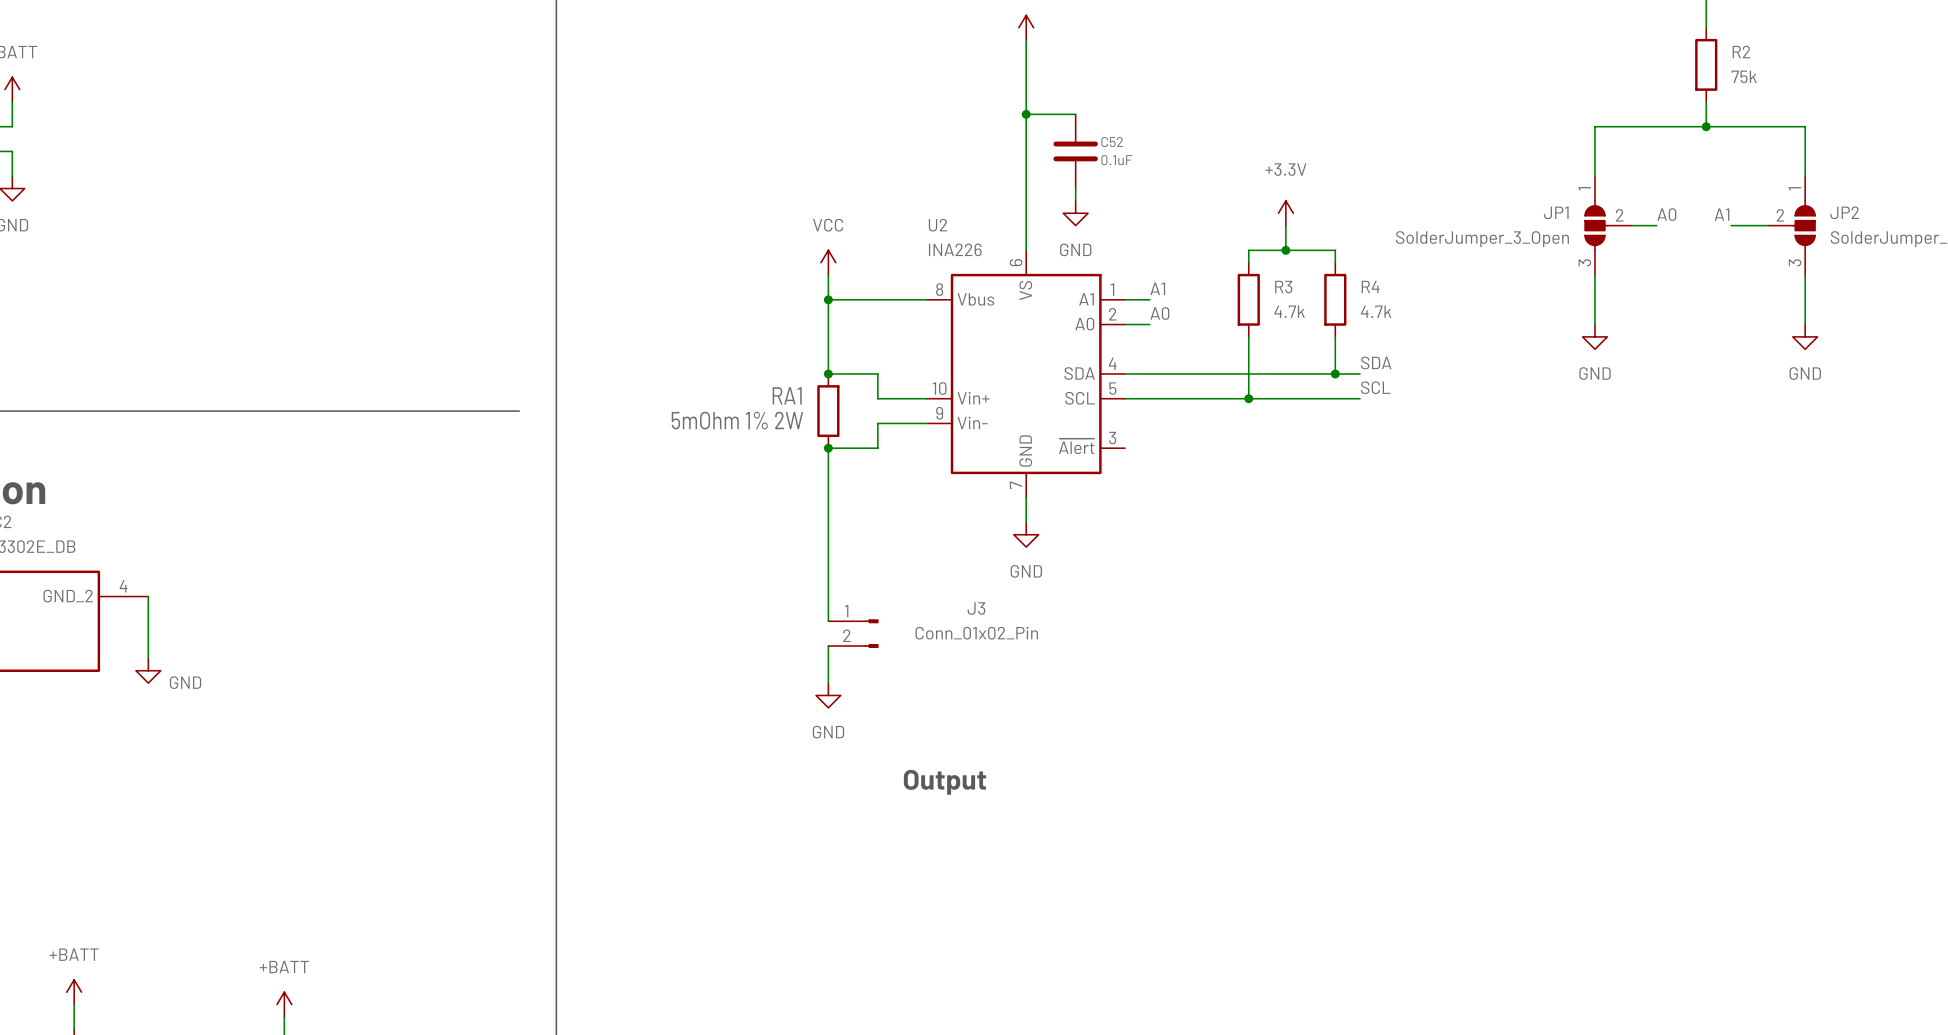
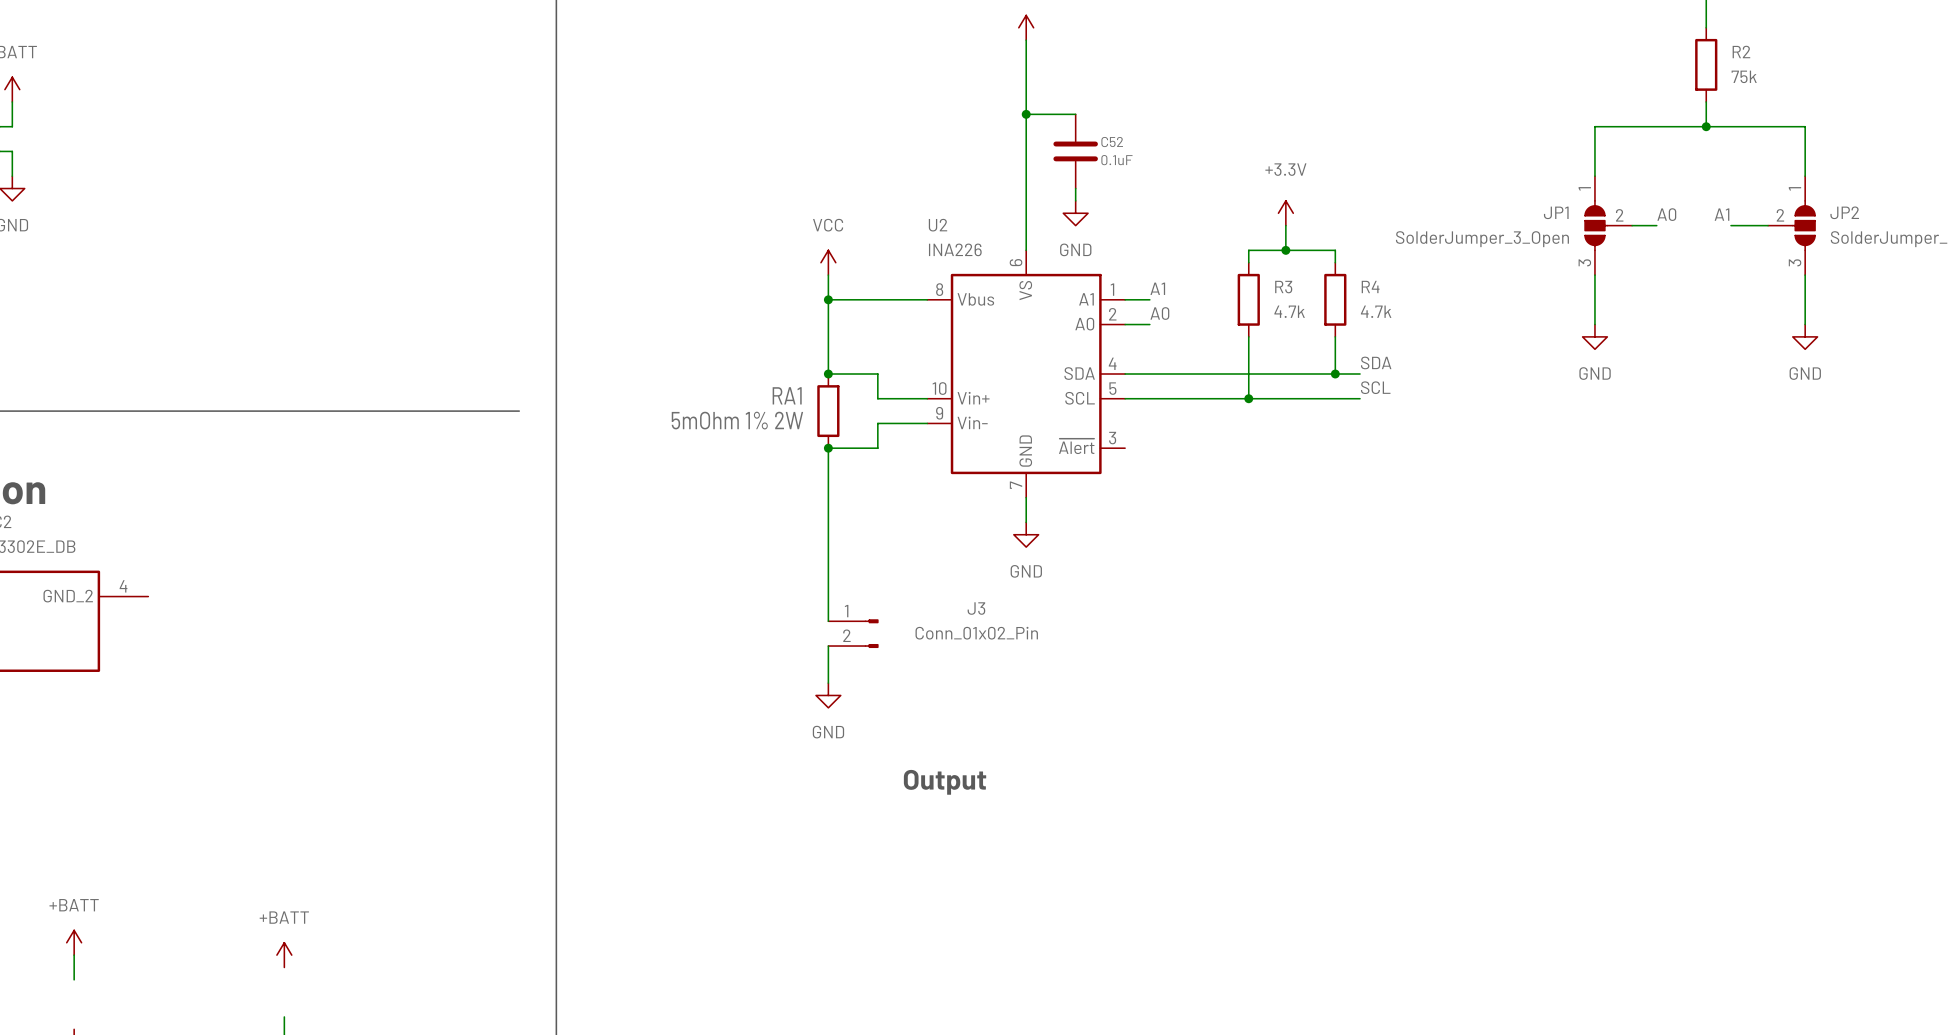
wire: (148, 596) (148, 658) -> none
power symbol: GND (148, 670) -> none
power symbol position: +BATT (74, 992) -> +BATT (74, 942)
wire: (74, 1004) (74, 1029) -> (74, 955) (74, 979)
power symbol position: +BATT (284, 1004) -> +BATT (284, 955)

